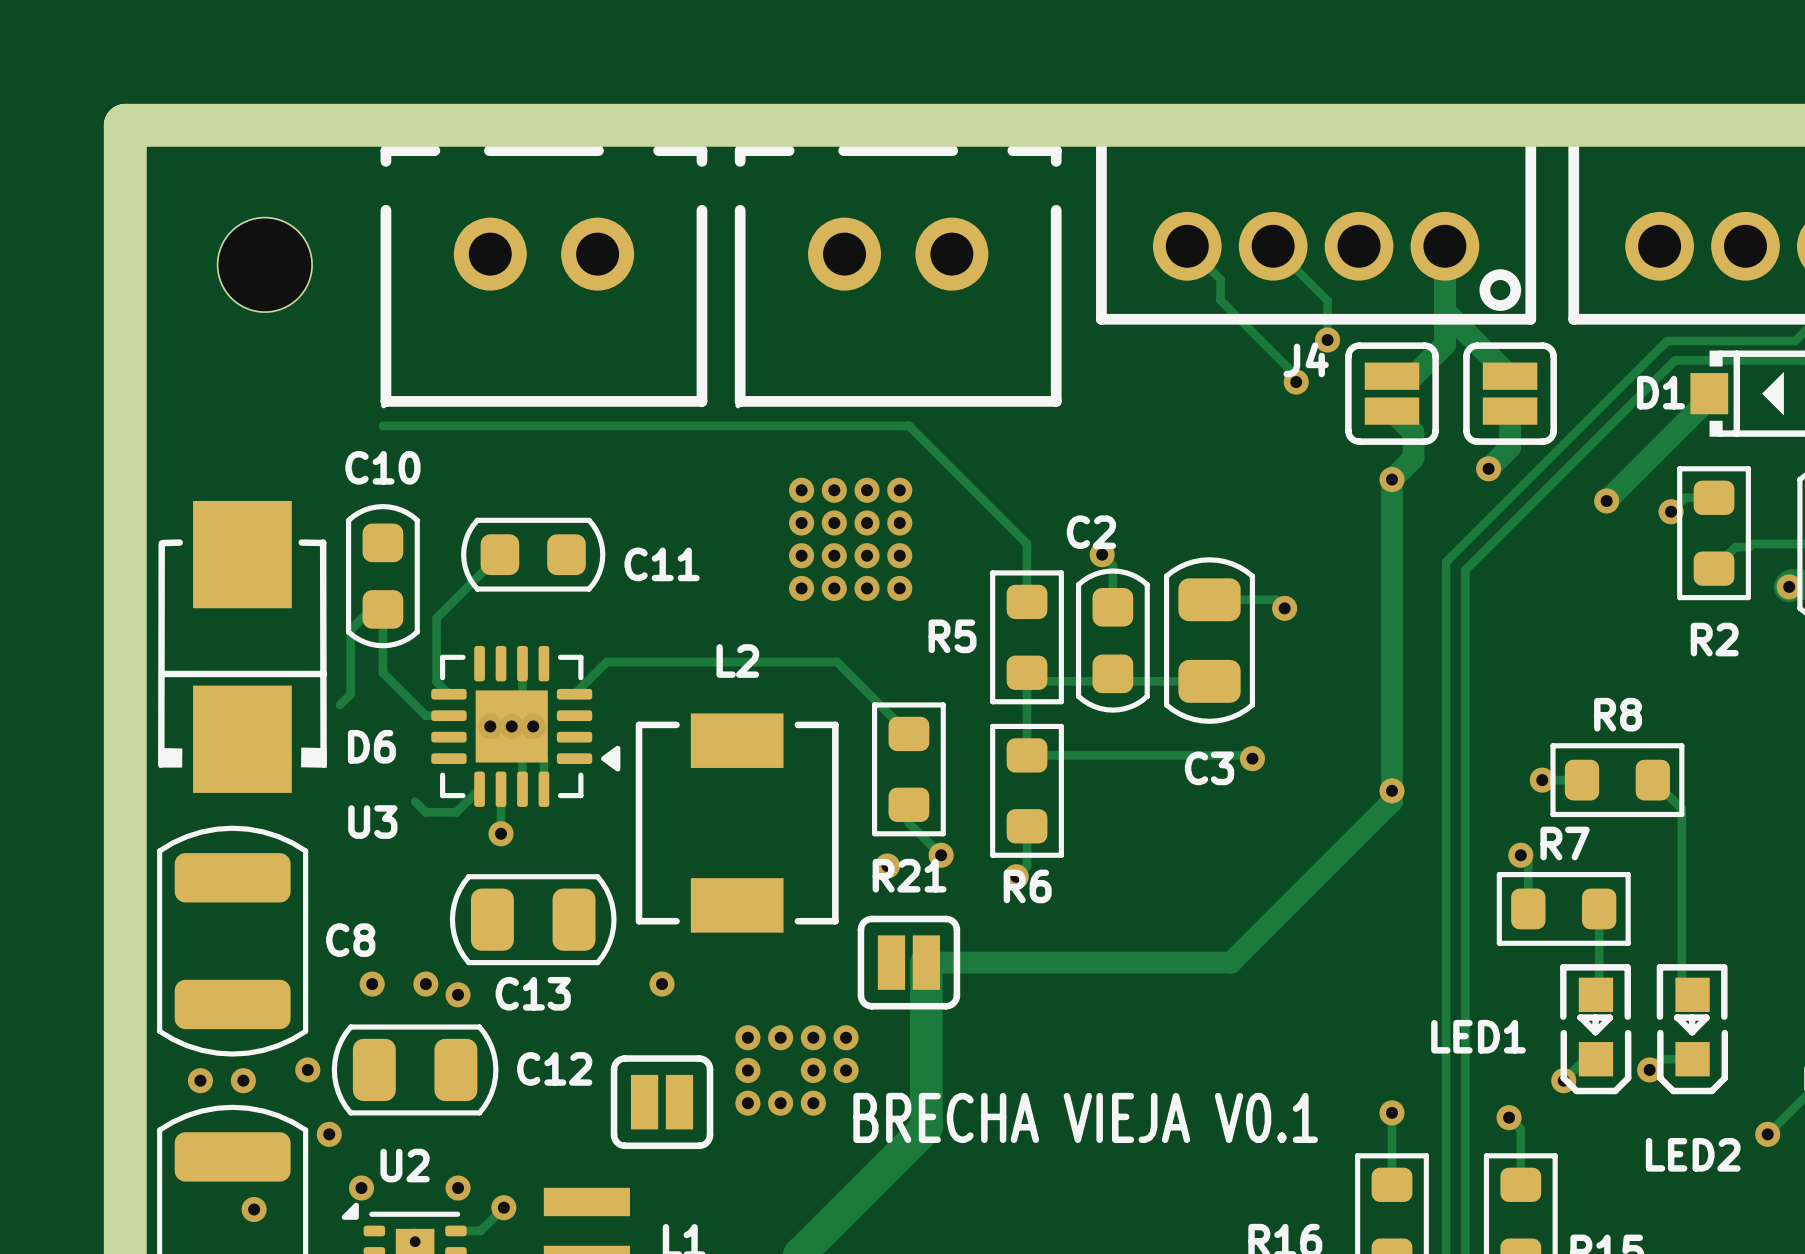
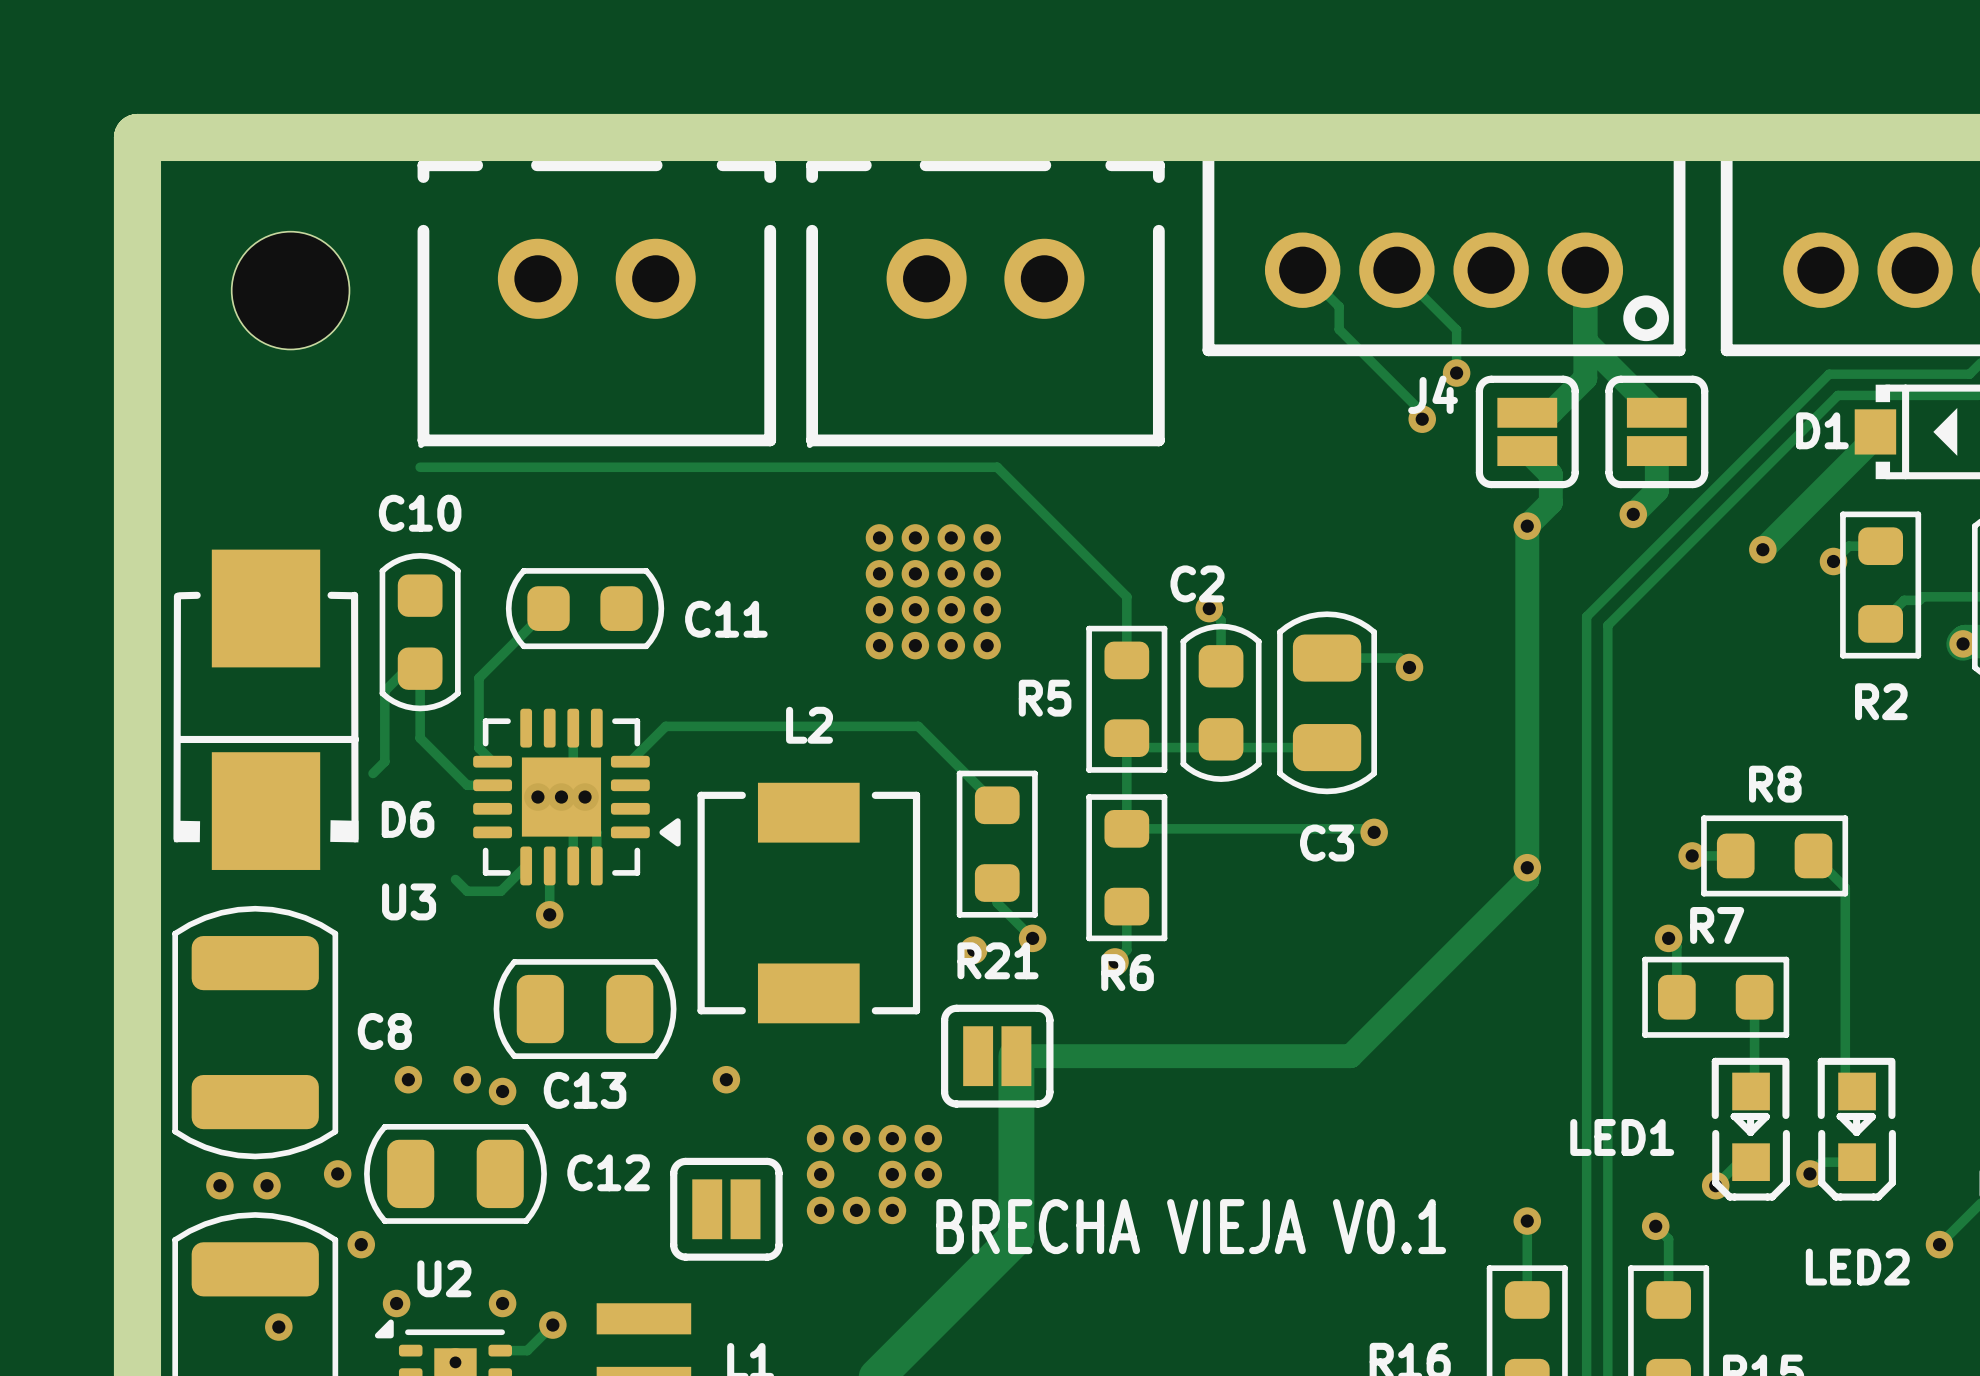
part footprint: [217, 217, 313, 313] -> [231, 231, 350, 350]

